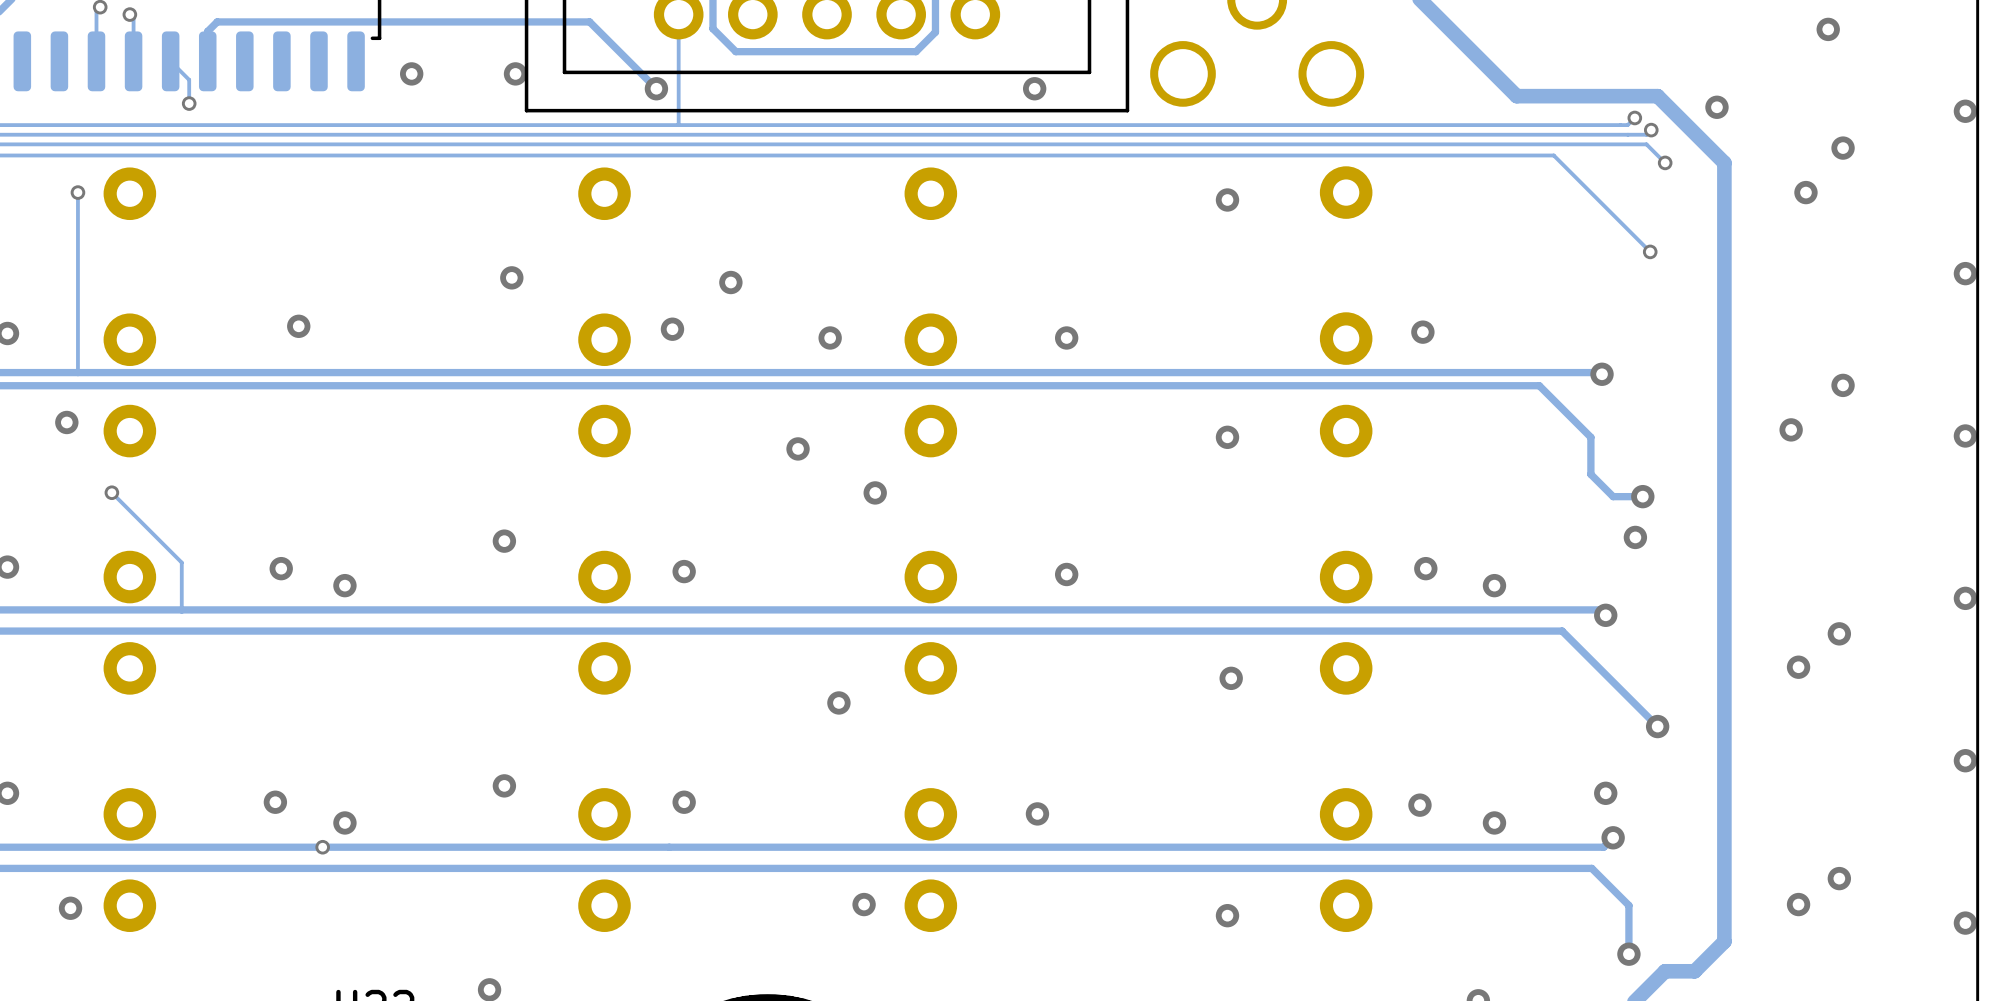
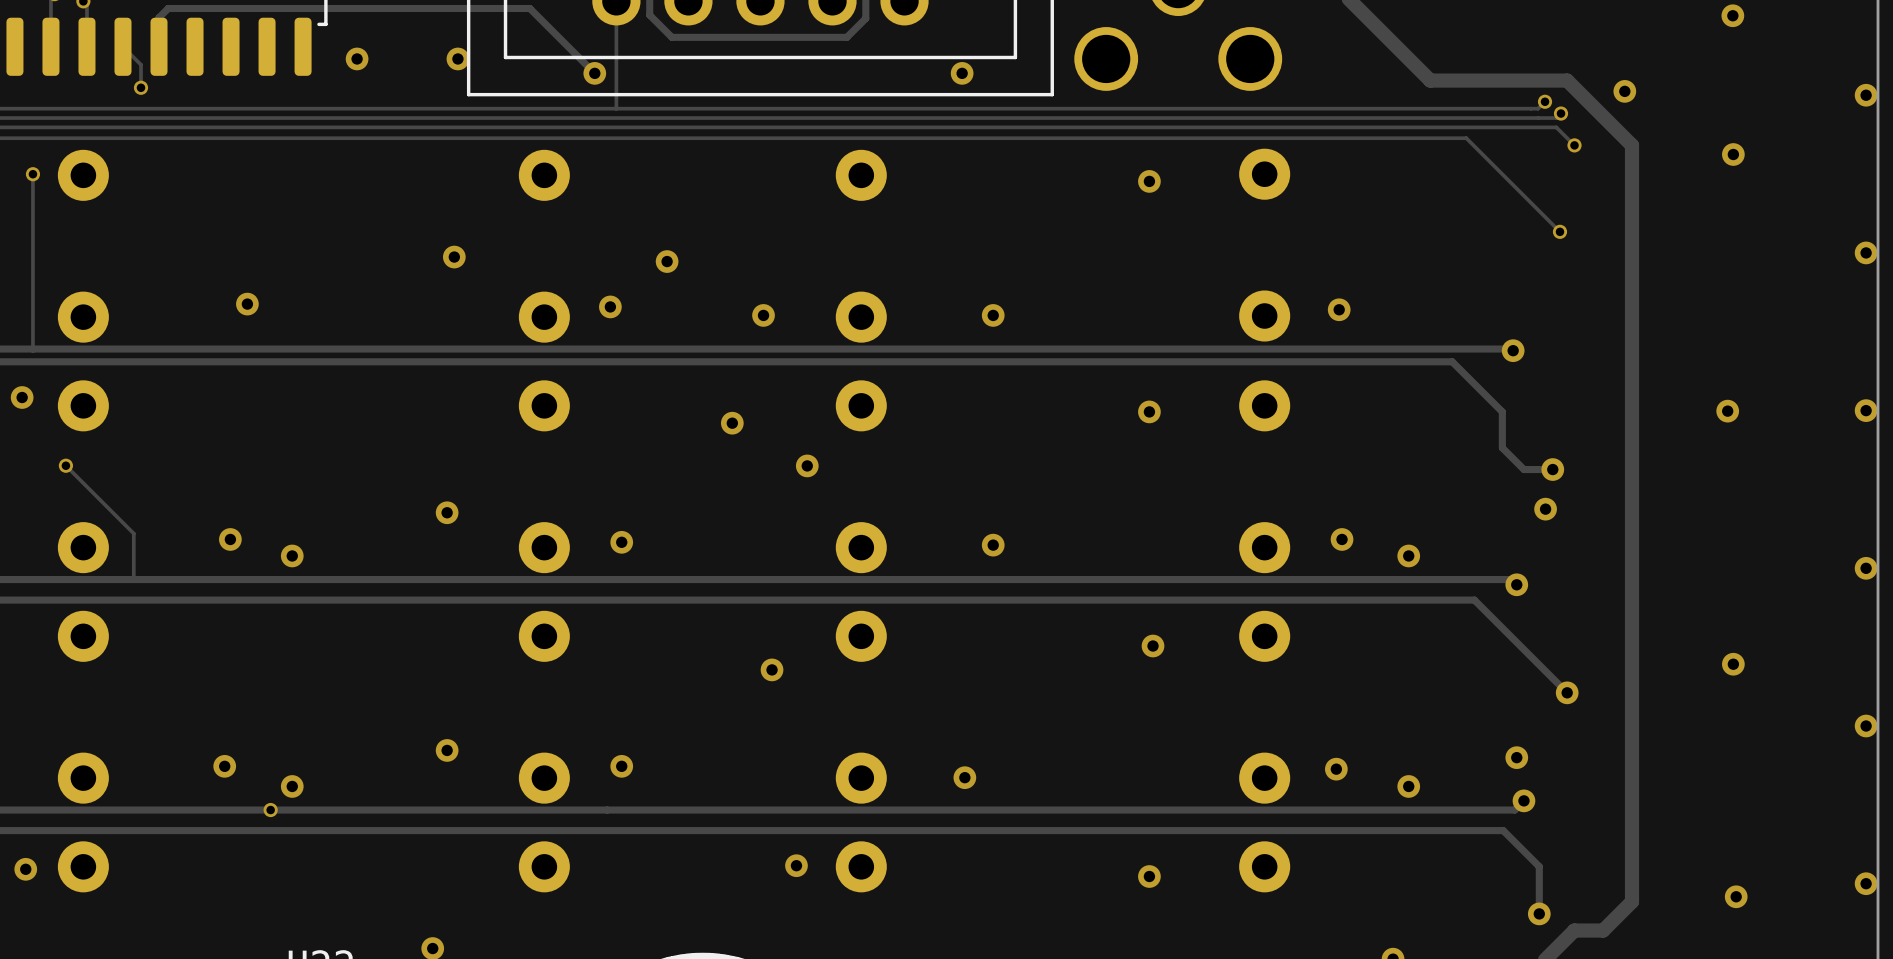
via: (1843, 148) -> none
via: none -> (1733, 154)
via: (1805, 192) -> none
via: (1843, 385) -> none
via: (1791, 429) -> none
via: none -> (1727, 411)
via: (1839, 633) -> none
via: (1798, 667) -> none
via: none -> (1733, 664)
via: (1839, 878) -> none
via: (1798, 904) -> none
via: none -> (1736, 896)

